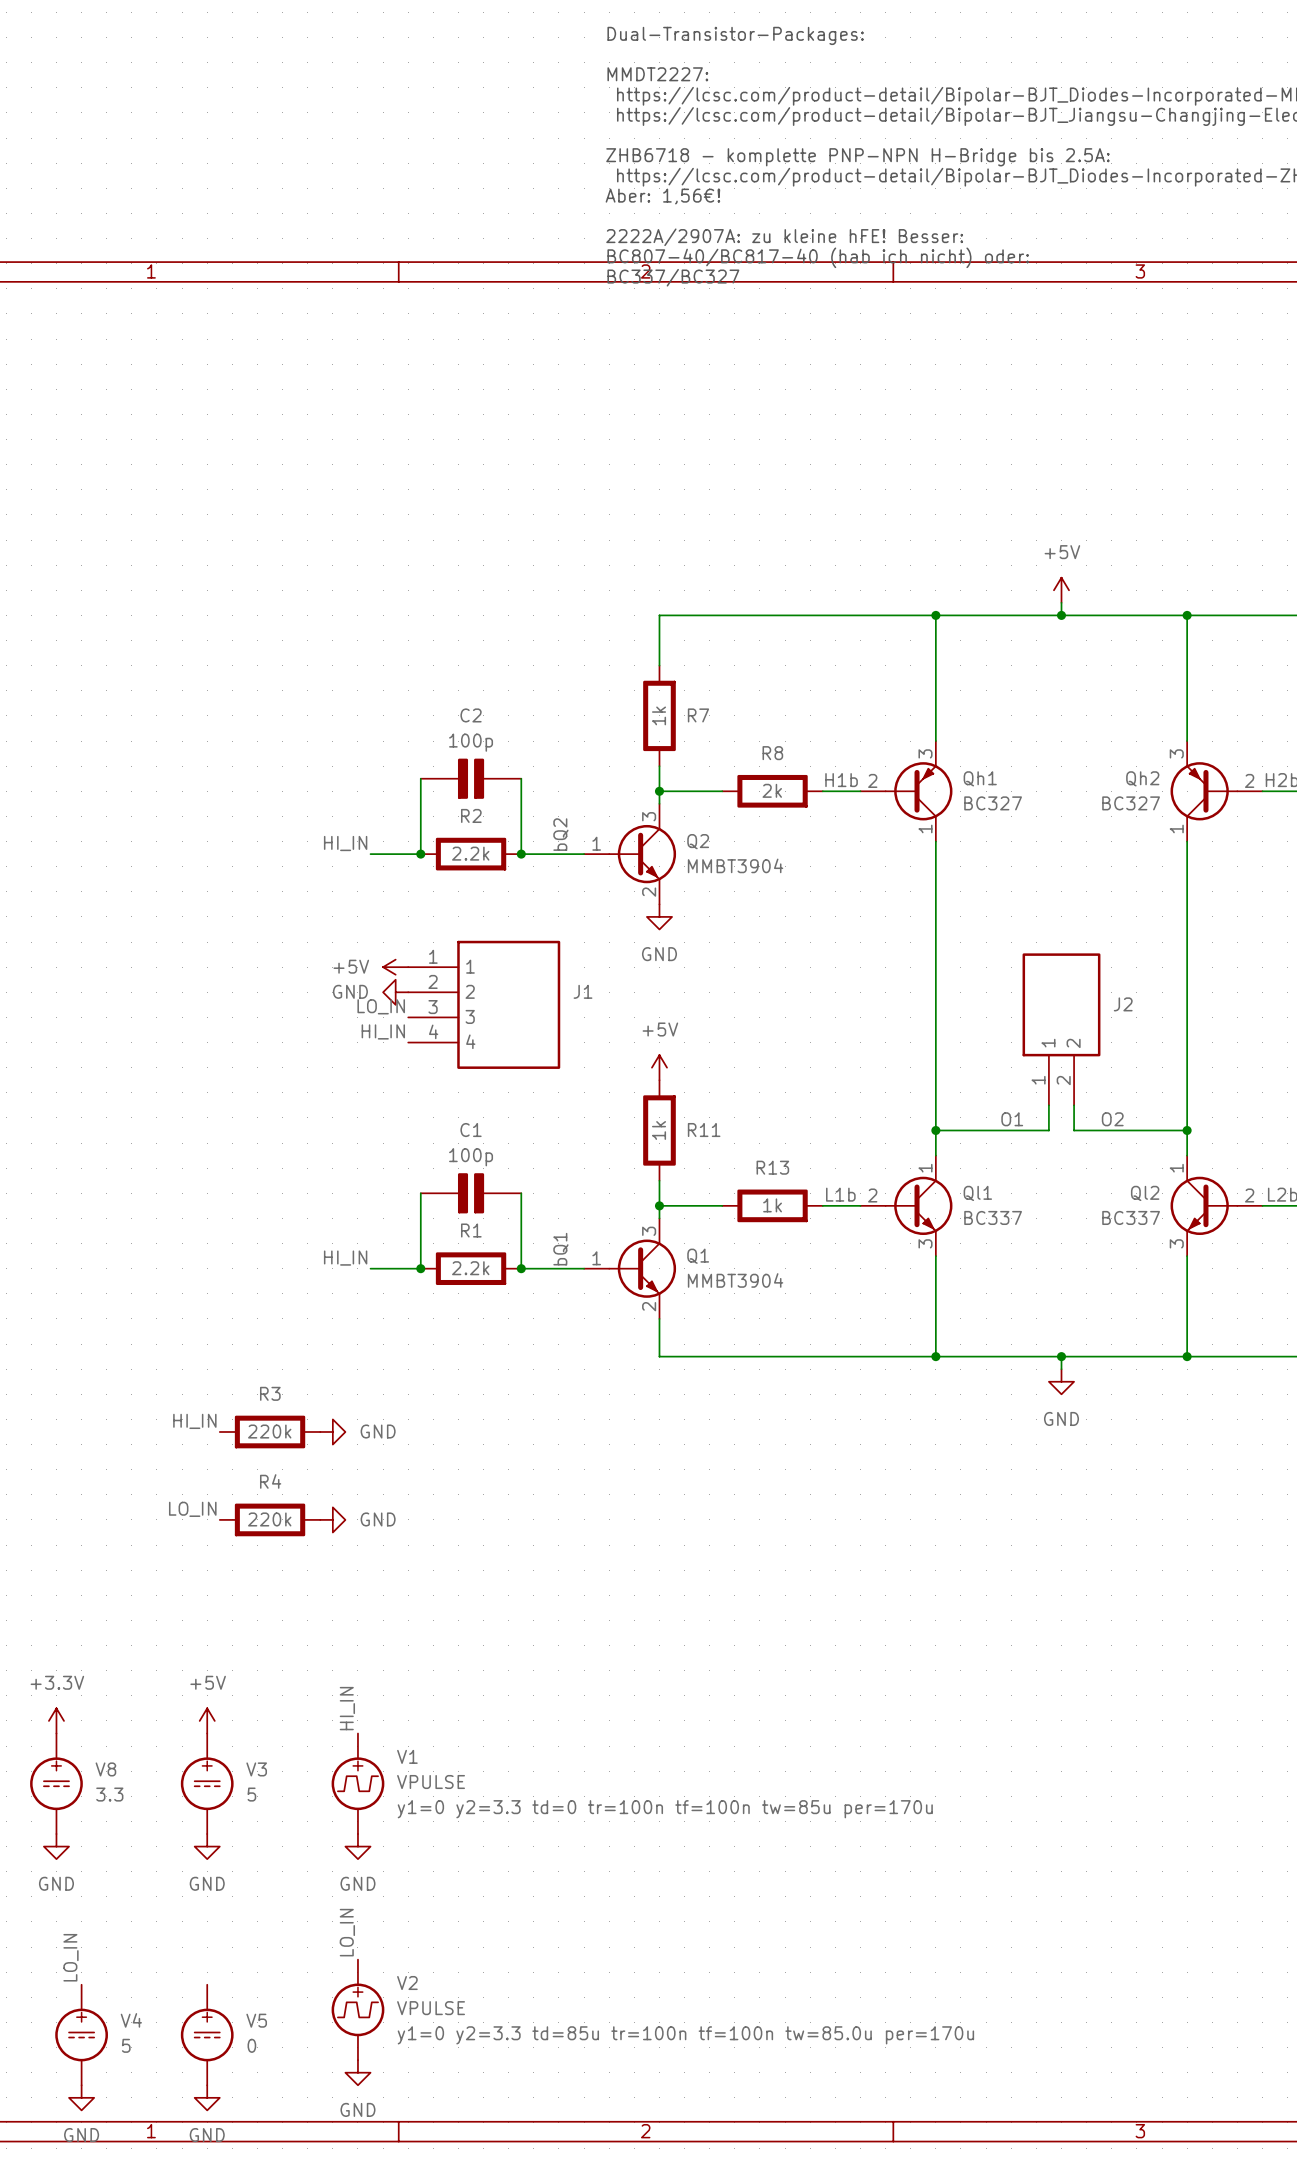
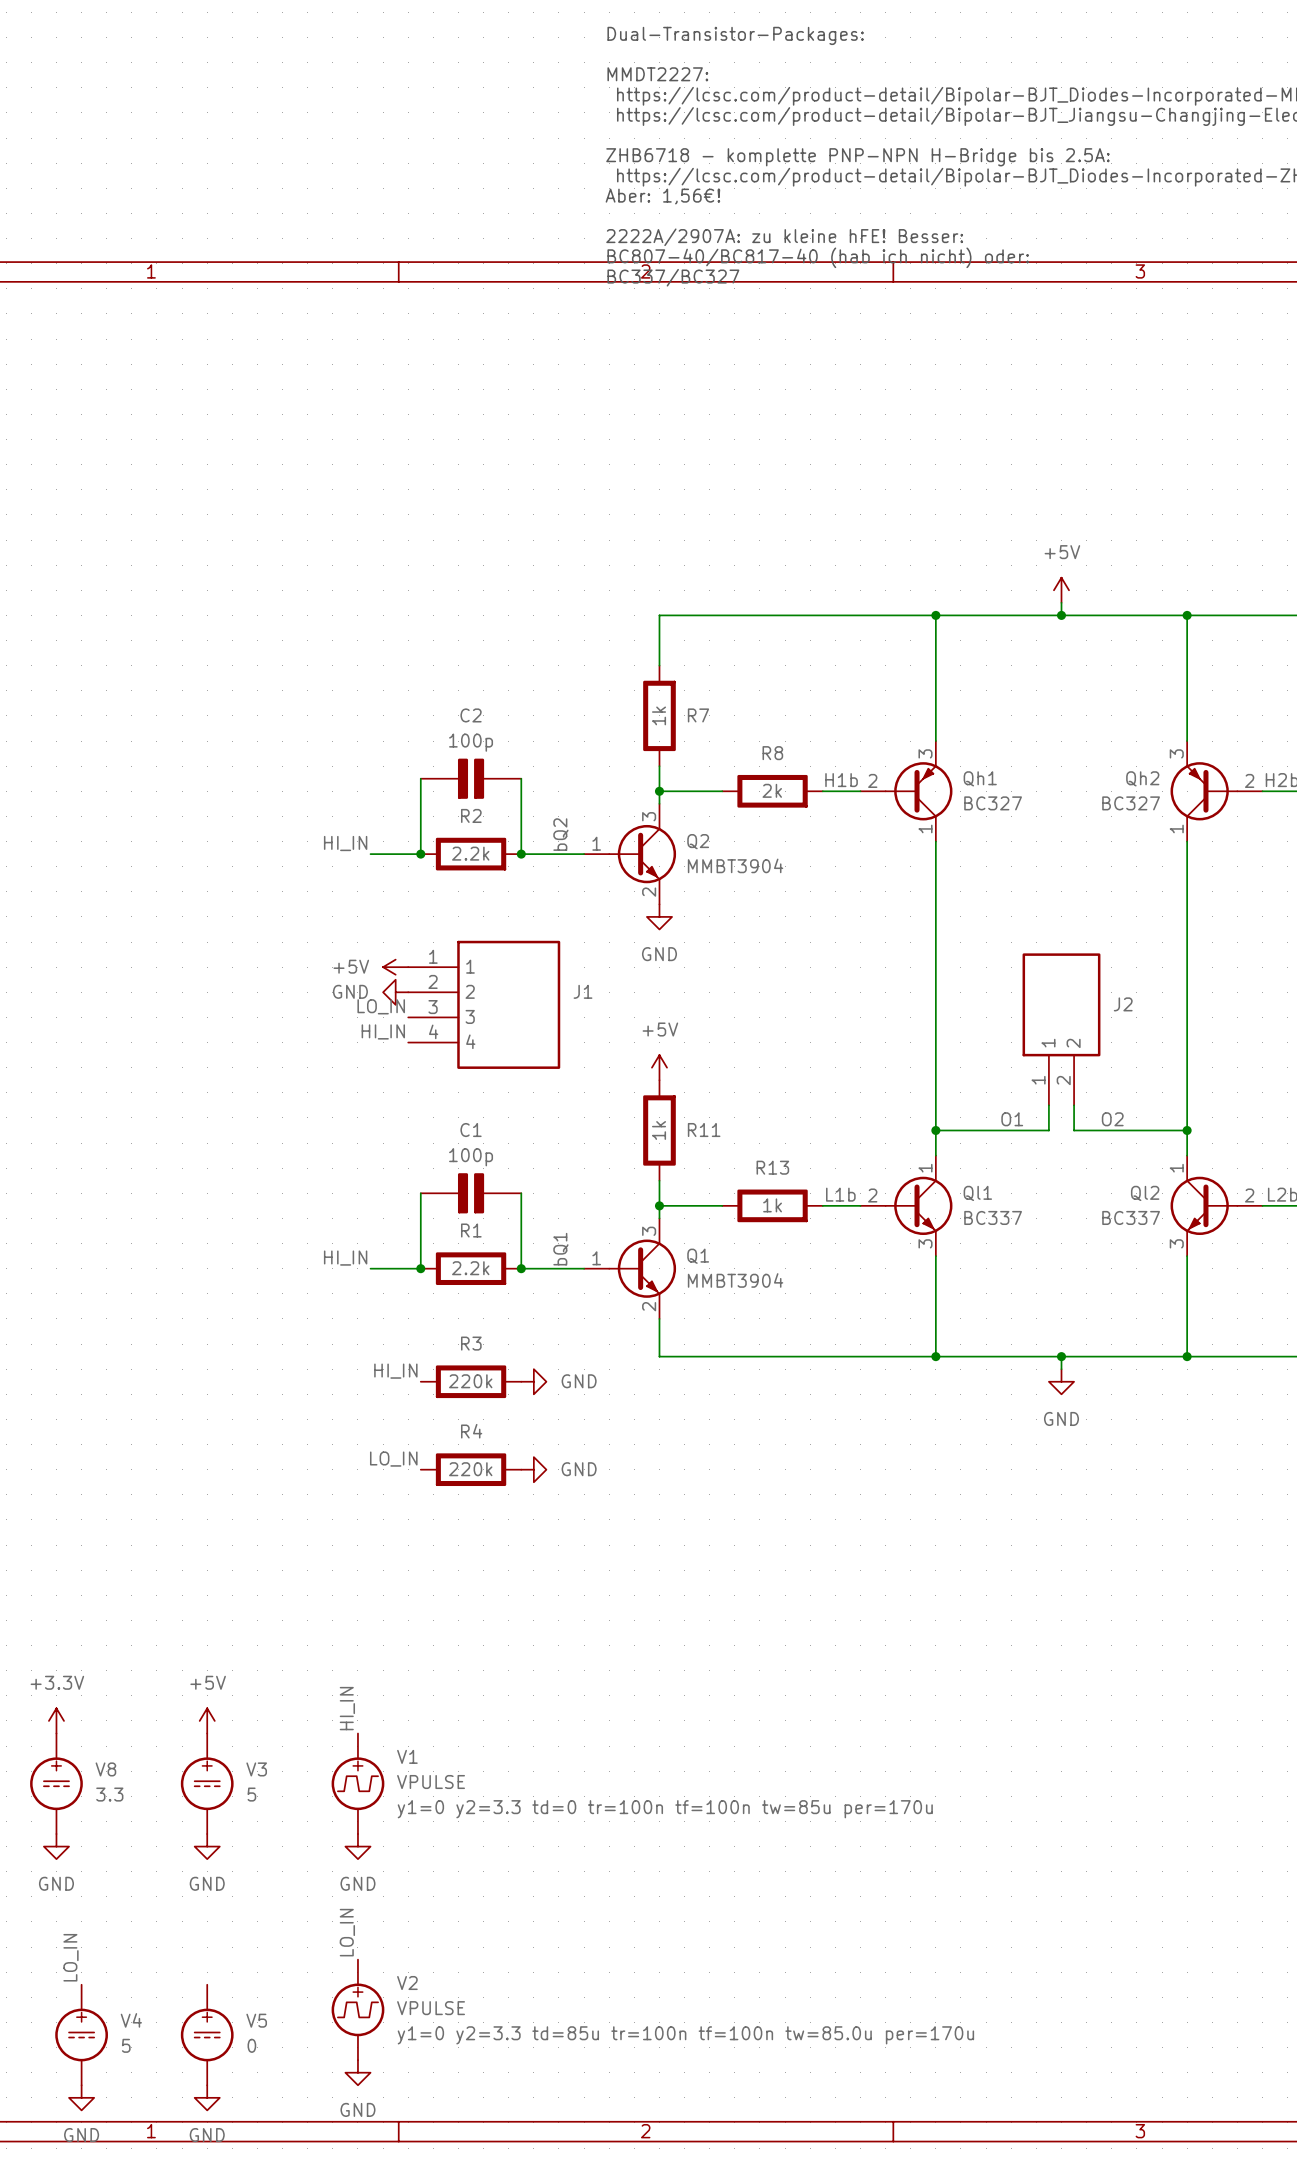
power symbol: none -> GND (533, 1381)
label position: HI_IN (194, 1421) -> HI_IN (395, 1371)
R3 position: (270, 1431) -> (471, 1381)
power symbol: GND (332, 1431) -> none
power symbol: none -> GND (533, 1469)
label position: LO_IN (192, 1509) -> LO_IN (393, 1459)
R4 position: (270, 1519) -> (471, 1469)
power symbol: GND (332, 1519) -> none

